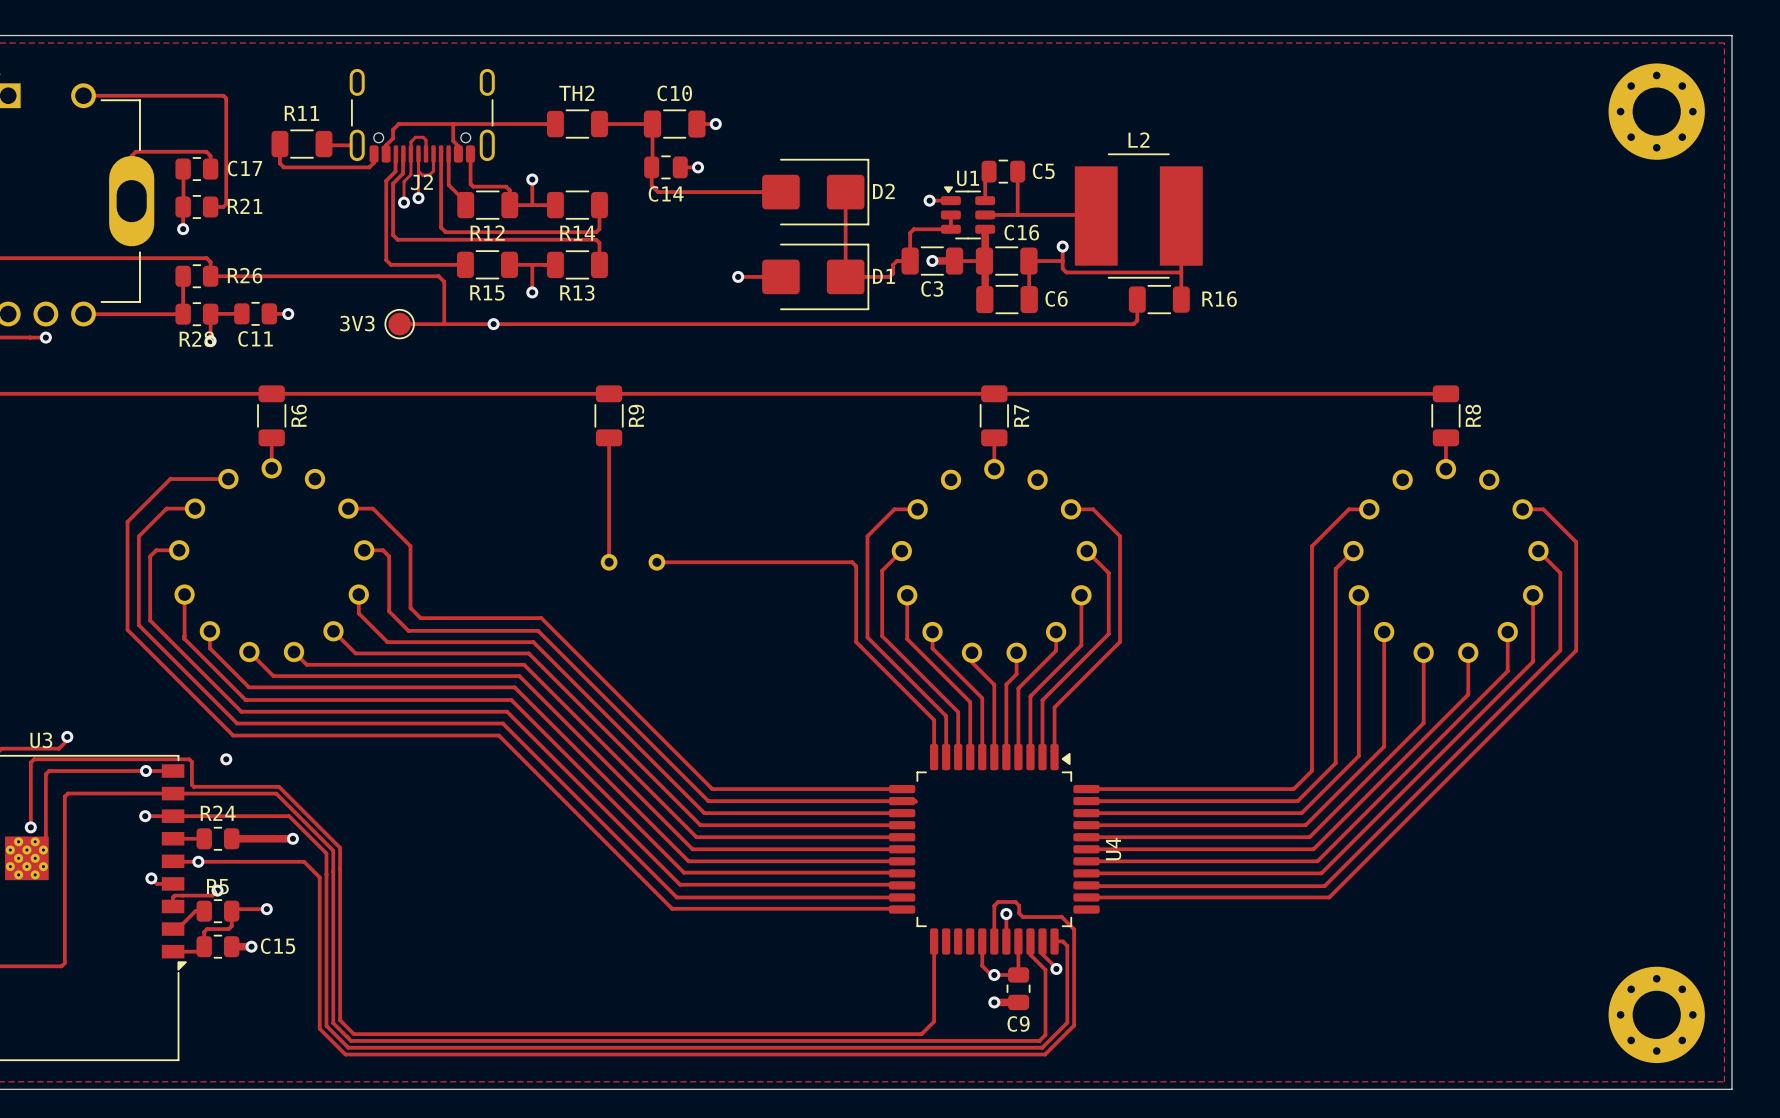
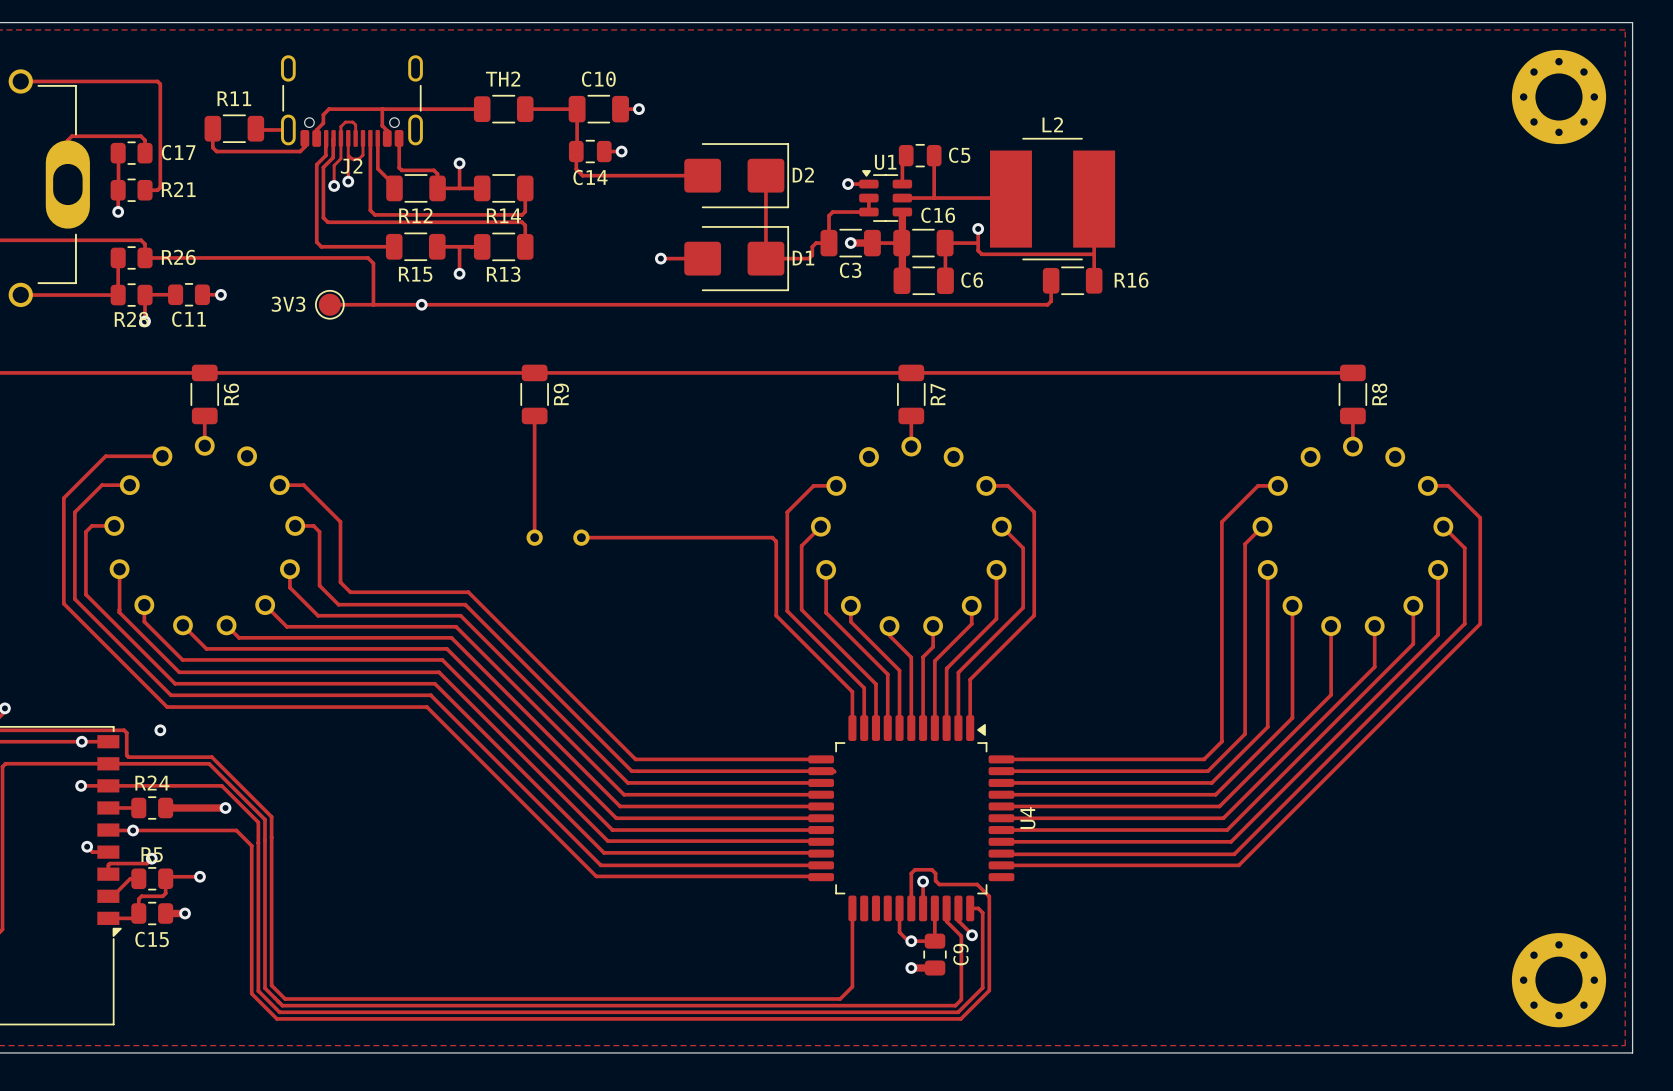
C15 name position: C15 (278, 946) -> C15 (152, 939)
C9 name rotation: 0° (1018, 1023) -> 90° counterclockwise (960, 954)
C9 name position: C9 (1018, 1023) -> C9 (960, 954)

